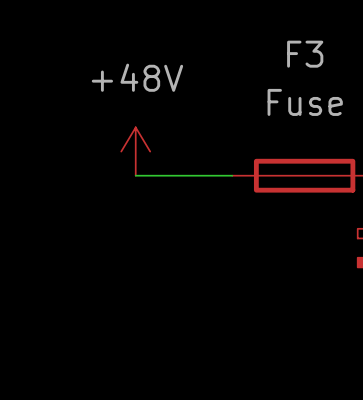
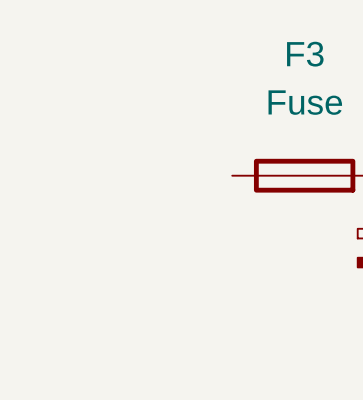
power symbol: +48V (135, 151) -> none
wire: (135, 175) (232, 175) -> none

